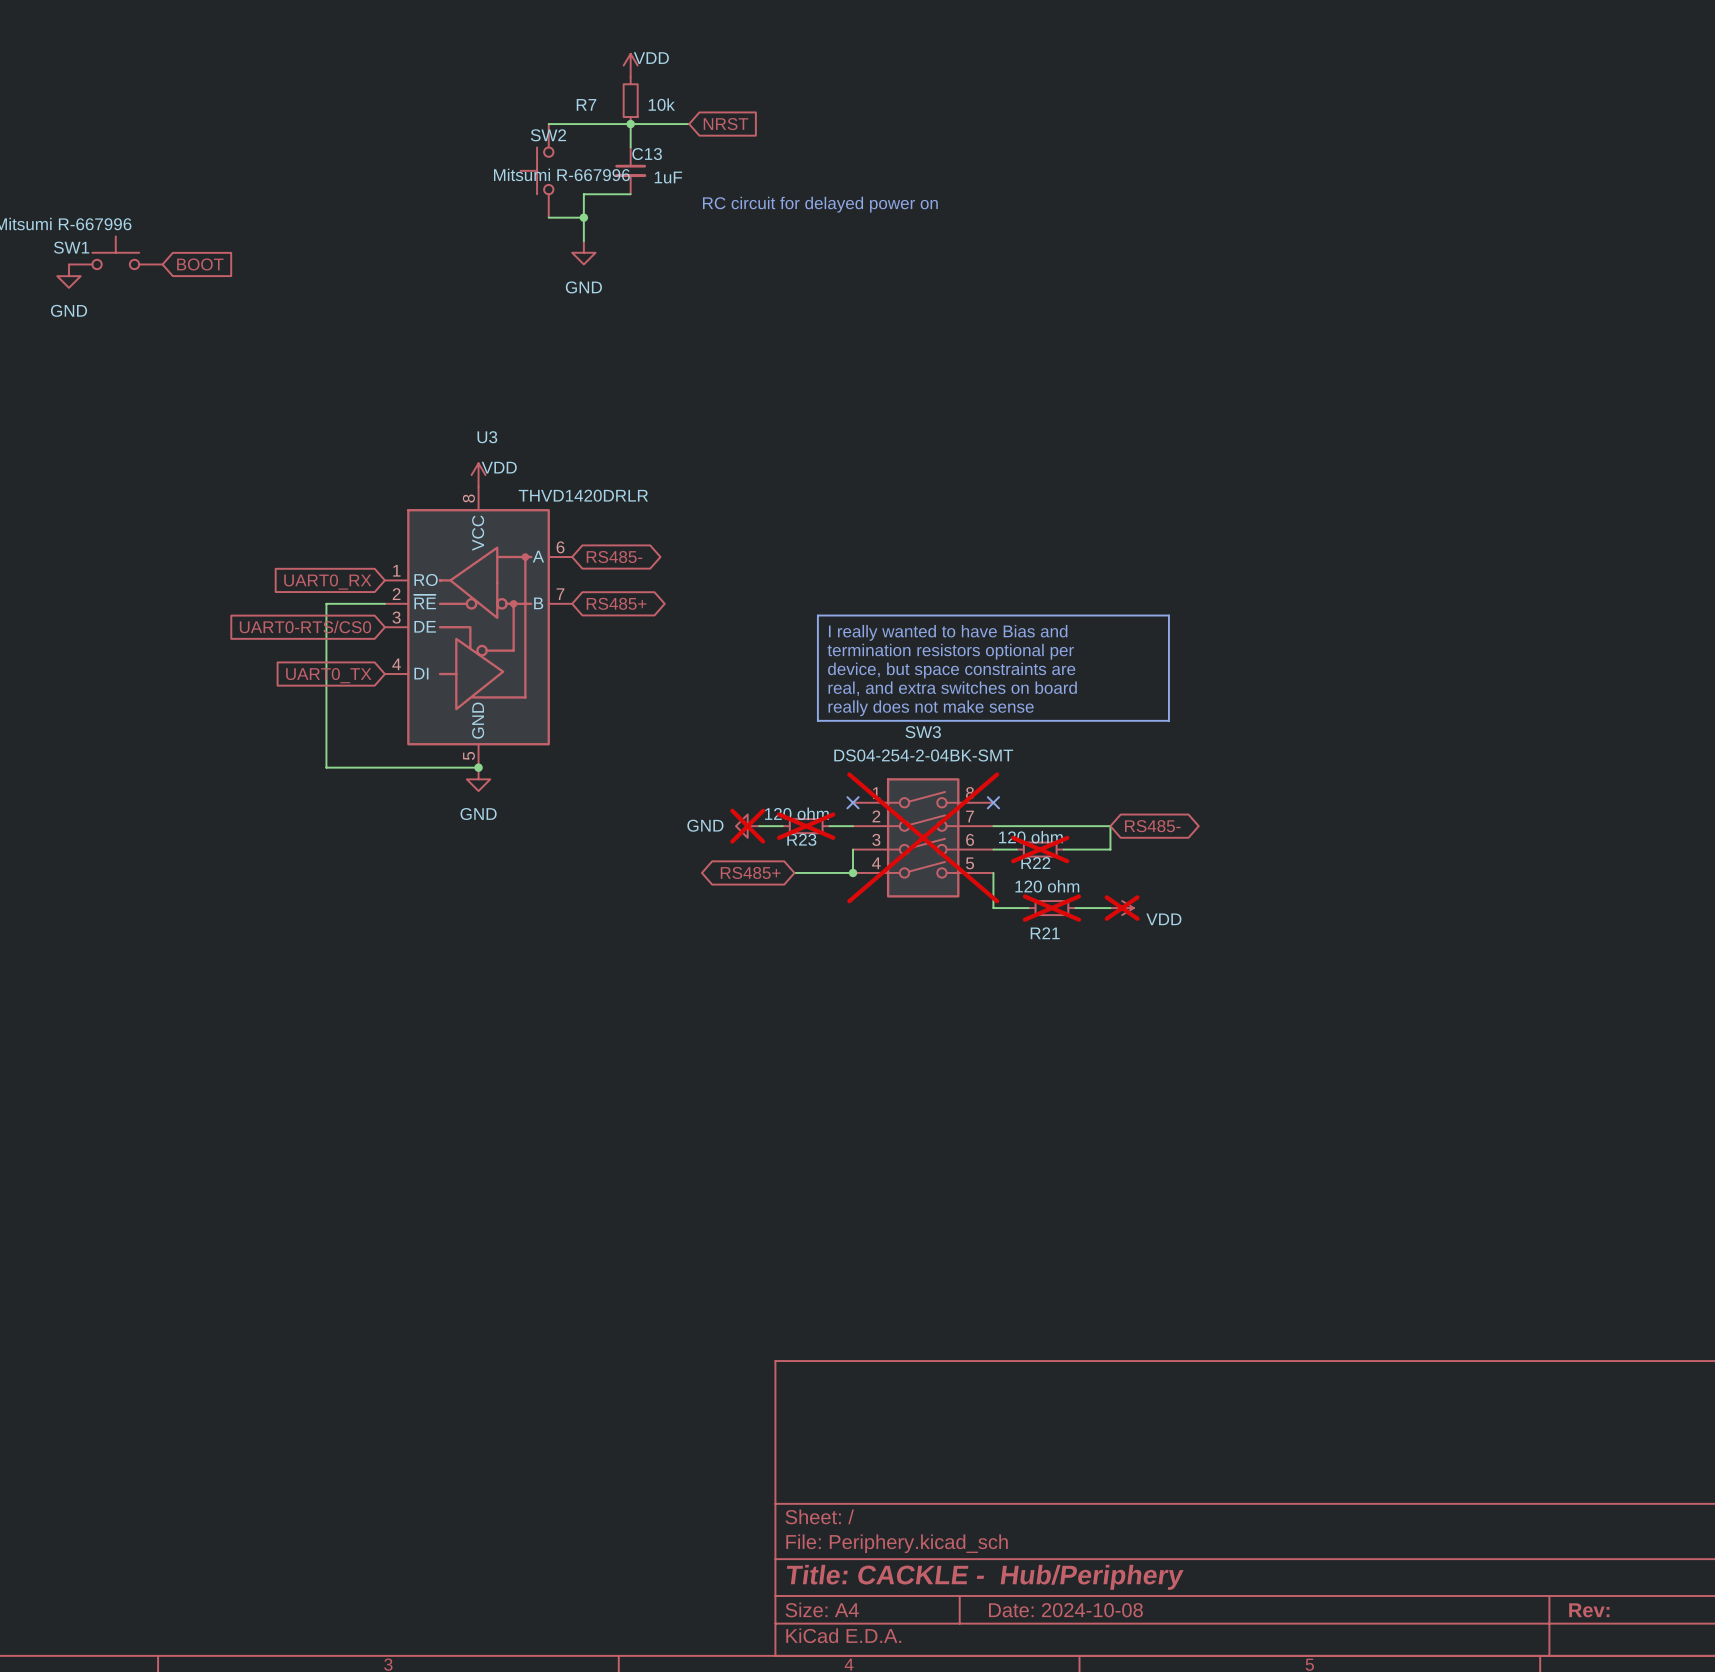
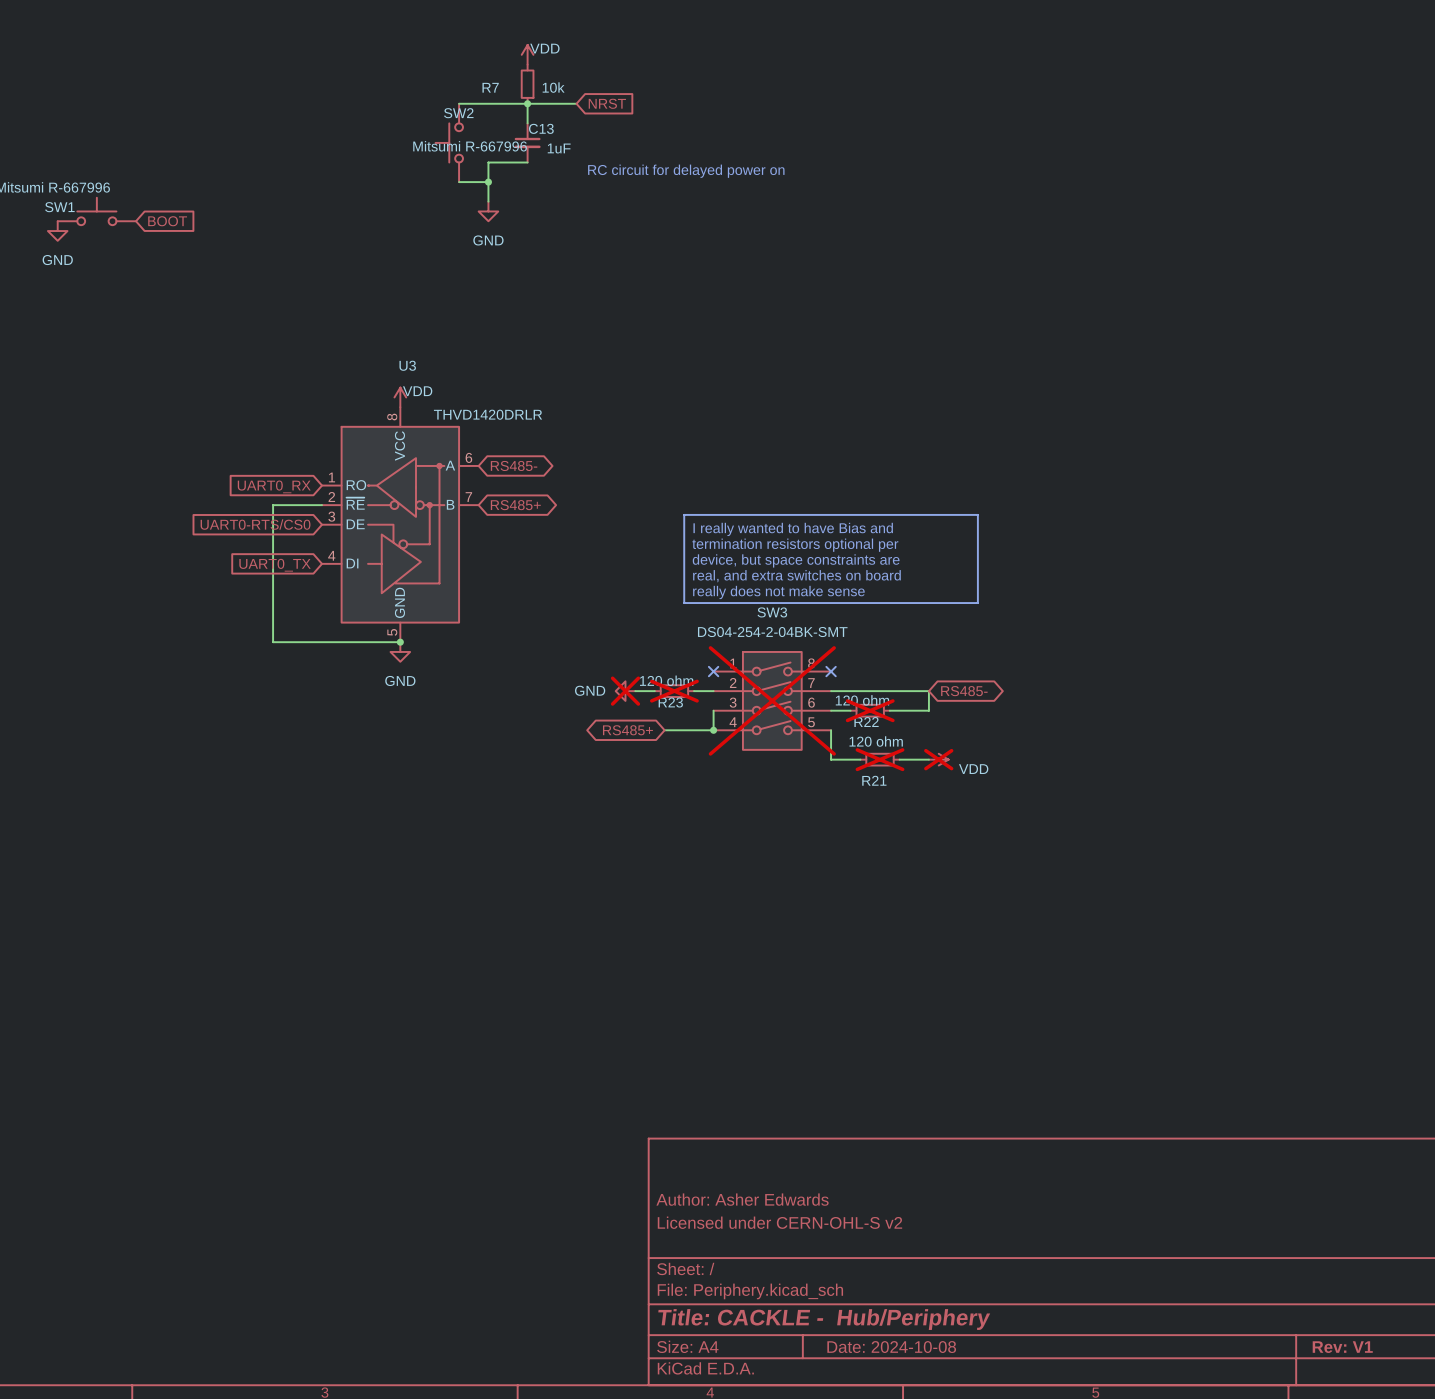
title block: none -> Author: Asher Edwards (742, 1199)
title block: none -> Licensed under CERN-OHL-S v2 (779, 1222)
title block: Rev: (1589, 1610) -> Rev: V1 (1342, 1347)

